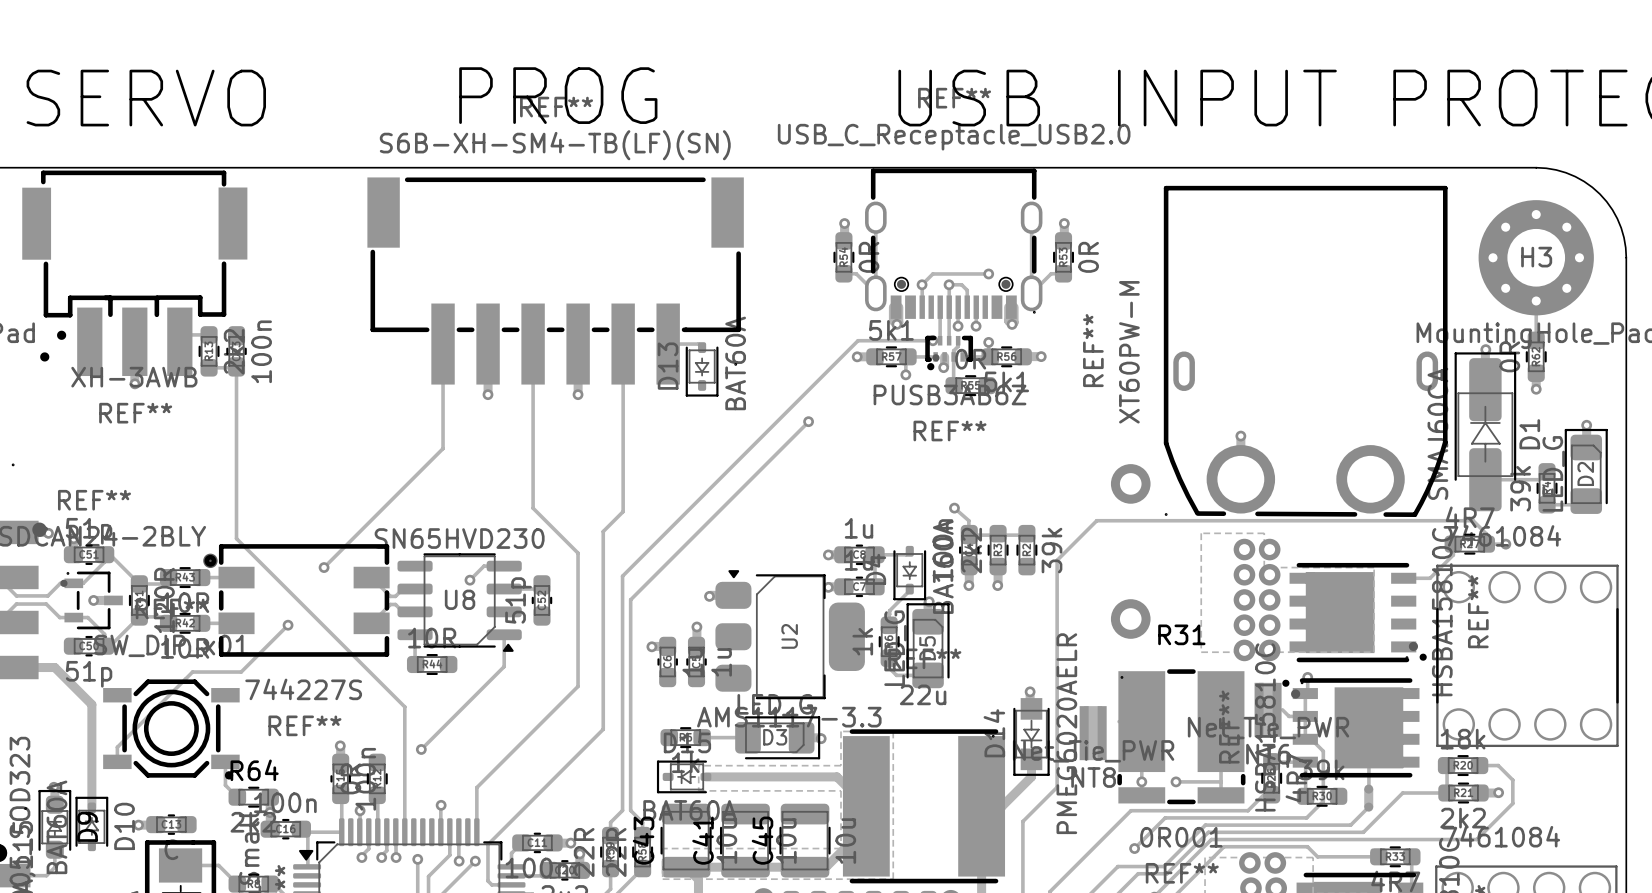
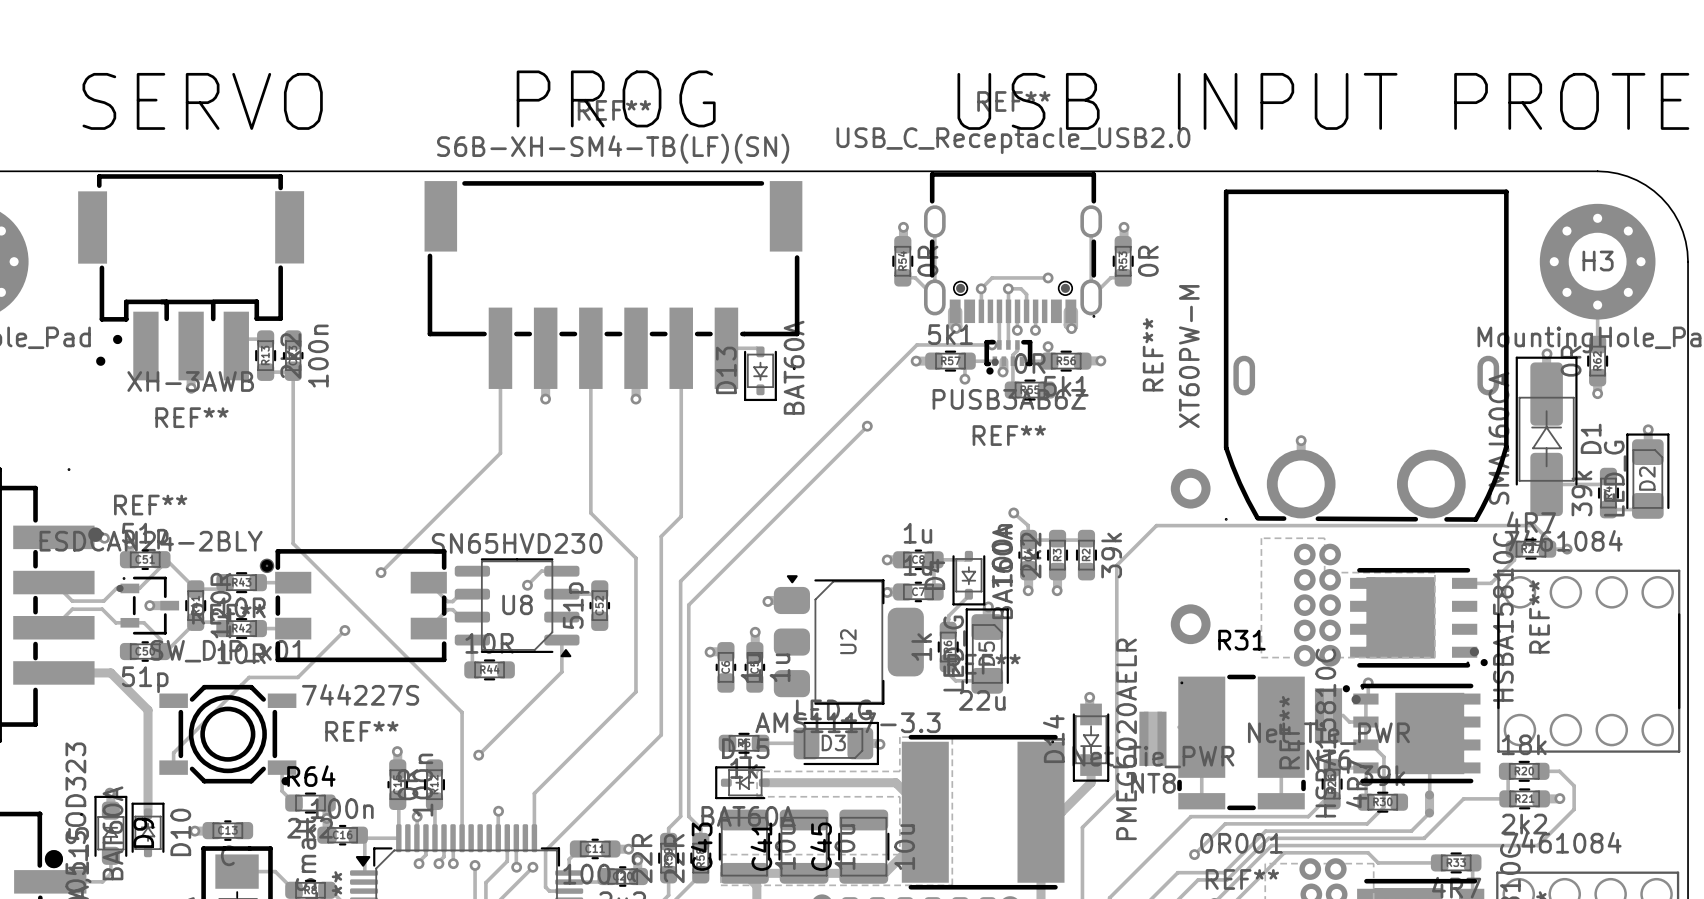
via: (1141, 781) -> none
track: (1176, 781) (1221, 781) -> none
via: (1176, 781) -> none

